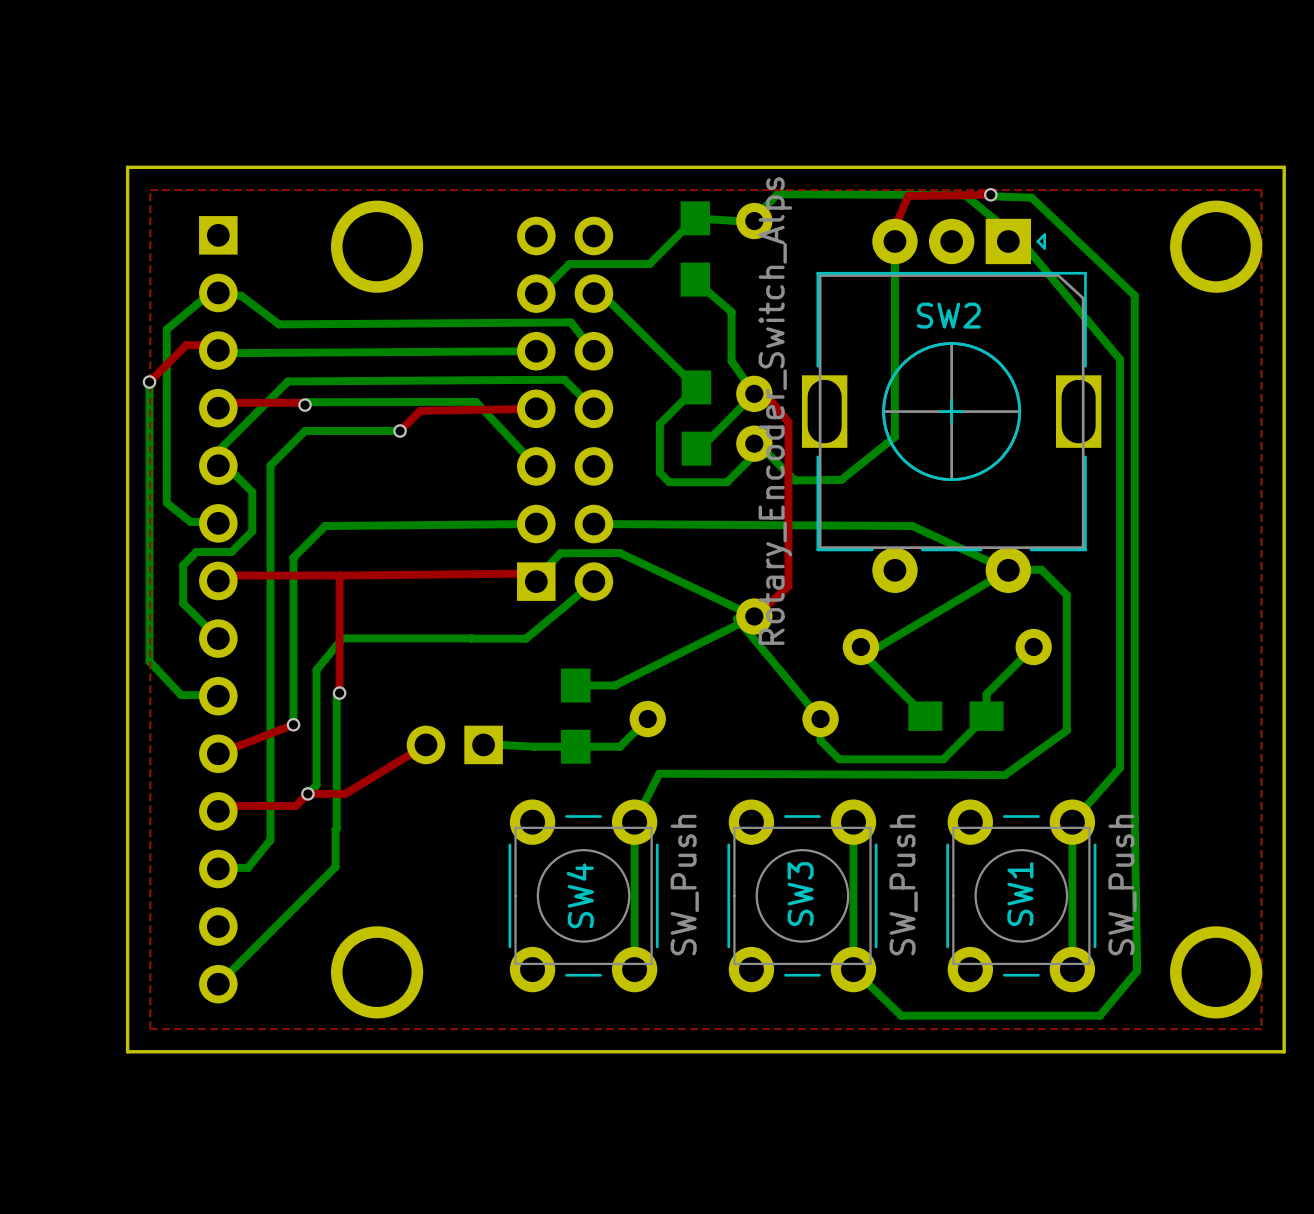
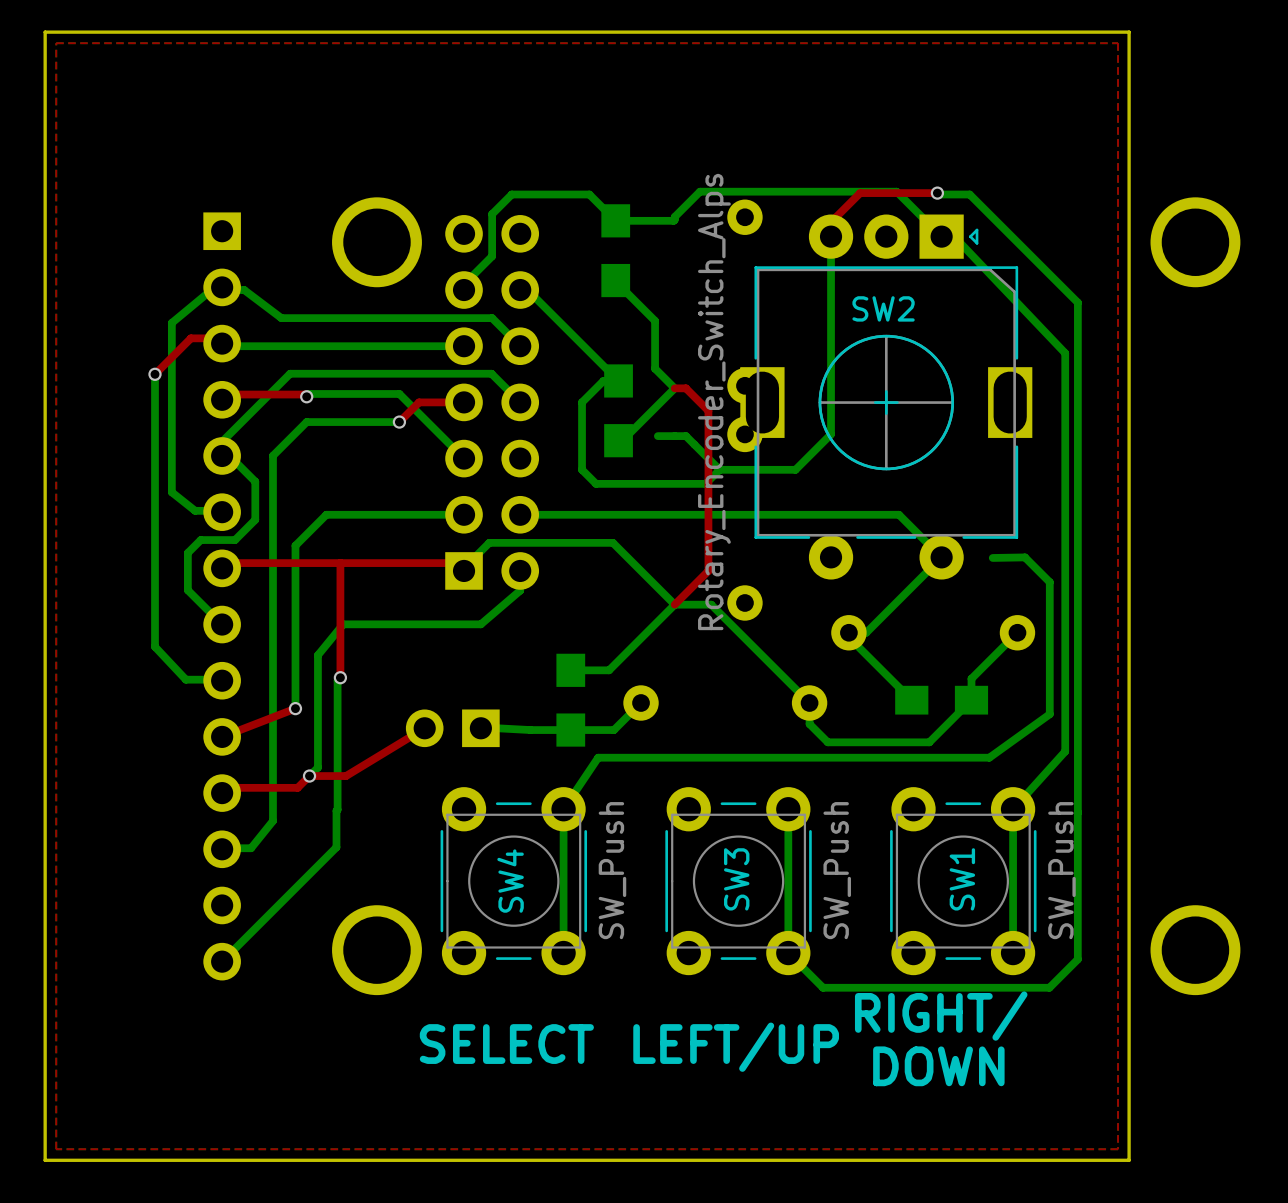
board edge: (127, 167) (127, 1051) (1284, 1051) (1284, 167) (127, 167) -> (45, 32) (45, 1160) (1129, 1160) (1129, 32) (45, 32)
top zone outline: (150, 189) (150, 1029) (1261, 1029) (1261, 189) (150, 189) -> (56, 43) (56, 1149) (1118, 1149) (1118, 43) (56, 43)
bottom track: (990, 194) (1031, 197) (1134, 295) (1134, 818) (1137, 971) (1099, 1015) (901, 1015) (853, 969) (853, 822) -> none
top track: (990, 194) (908, 195) (894, 226) (894, 241) -> none
via position: (990, 194) -> (937, 193)
bottom track: none -> (937, 193) (969, 194) (1077, 302) (1077, 959) (1049, 987) (823, 987) (788, 953) (788, 809)
top track: none -> (937, 193) (860, 193) (831, 222) (831, 236)
bottom track: none -> (831, 236) (831, 434) (795, 469) (719, 469)
bottom track: (894, 241) (894, 437) (841, 479) (794, 480) (758, 443) -> none
part position: (695, 248) -> (615, 250)
bottom track: (695, 279) (731, 312) (731, 361) (754, 393) (700, 448) (696, 448) -> none
bottom track: none -> (615, 280) (655, 320) (655, 368) (674, 388) (622, 440) (618, 440)
bottom track: (539, 293) (569, 264) (649, 264) (695, 218) (753, 222) (754, 218) (777, 194) (965, 195) (1021, 241) (1120, 359) (1120, 767) (1072, 822) (1072, 969) -> none
bottom track: none -> (464, 290) (464, 284) (492, 256) (492, 214) (511, 194) (589, 194) (615, 220) (673, 220) (674, 216) (700, 191) (896, 191) (941, 236) (954, 236) (1065, 353) (1065, 751) (1013, 809) (1013, 953)
bottom track: (593, 303) (593, 293) (601, 293) (696, 387) -> none
bottom track: none -> (520, 299) (520, 290) (527, 290) (618, 380) (618, 368)
bottom track: (279, 324) (570, 322) (593, 351) -> (281, 318) (492, 318) (520, 346)
bottom track: (536, 351) (216, 353) -> (464, 346) (220, 346)
bottom track: (288, 381) (564, 379) (593, 408) -> (290, 373) (491, 373) (520, 402)
bottom track: (696, 387) (659, 424) (659, 472) (669, 482) (726, 482) (754, 454) (754, 443) (765, 443) (756, 454) -> none
bottom track: none -> (619, 380) (603, 380) (582, 402) (582, 469) (596, 483) (705, 483) (719, 469)
top track: (754, 393) (765, 393) (788, 422) (788, 586) (754, 616) -> none
top track: none -> (674, 388) (685, 388) (708, 410) (708, 570) (674, 604)
bottom track: (307, 402) (475, 401) (536, 466) (533, 463) -> (309, 393) (399, 393) (464, 458)
SW2 position: (951, 405) -> (886, 397)
top track: (536, 408) (420, 410) -> (464, 402) (419, 402)
part position: (565, 408) -> (492, 402)
part position: (696, 418) -> (618, 410)
bottom track: none -> (657, 436) (685, 436) (719, 469)
bottom track: (593, 524) (912, 526) (1008, 570) (878, 647) -> (520, 514) (898, 514) (941, 557) (866, 632)
bottom track: (325, 526) (536, 524) (536, 529) -> (326, 514) (464, 514) (464, 520)
top track: (339, 575) (528, 573) (536, 581) -> (340, 563) (456, 563) (464, 570)
bottom track: (536, 581) (536, 578) (560, 553) (619, 553) (754, 616) -> none
bottom track: (593, 581) (525, 638) (471, 638) -> (520, 570) (520, 590) (480, 624) (469, 624)
bottom track: none -> (464, 570) (464, 568) (489, 542) (612, 542) (674, 604)
bottom track: (754, 616) (737, 618) (820, 719) -> (674, 604) (711, 604) (809, 703)
bottom track: (754, 616) (615, 685) -> (674, 604) (609, 670)
bottom track: (1004, 775) (659, 773) (634, 822) (634, 969) -> (989, 757) (598, 757) (563, 809) (563, 953)
SW4 position: (583, 895) -> (513, 881)
SW3 position: (802, 895) -> (738, 881)
SW1 position: (1021, 895) -> (963, 881)
text: none -> RIGHT/ (941, 1016)
text: none -> SELECT (506, 1044)
text: none -> LEFT/UP (736, 1047)
text: none -> DOWN (938, 1066)

